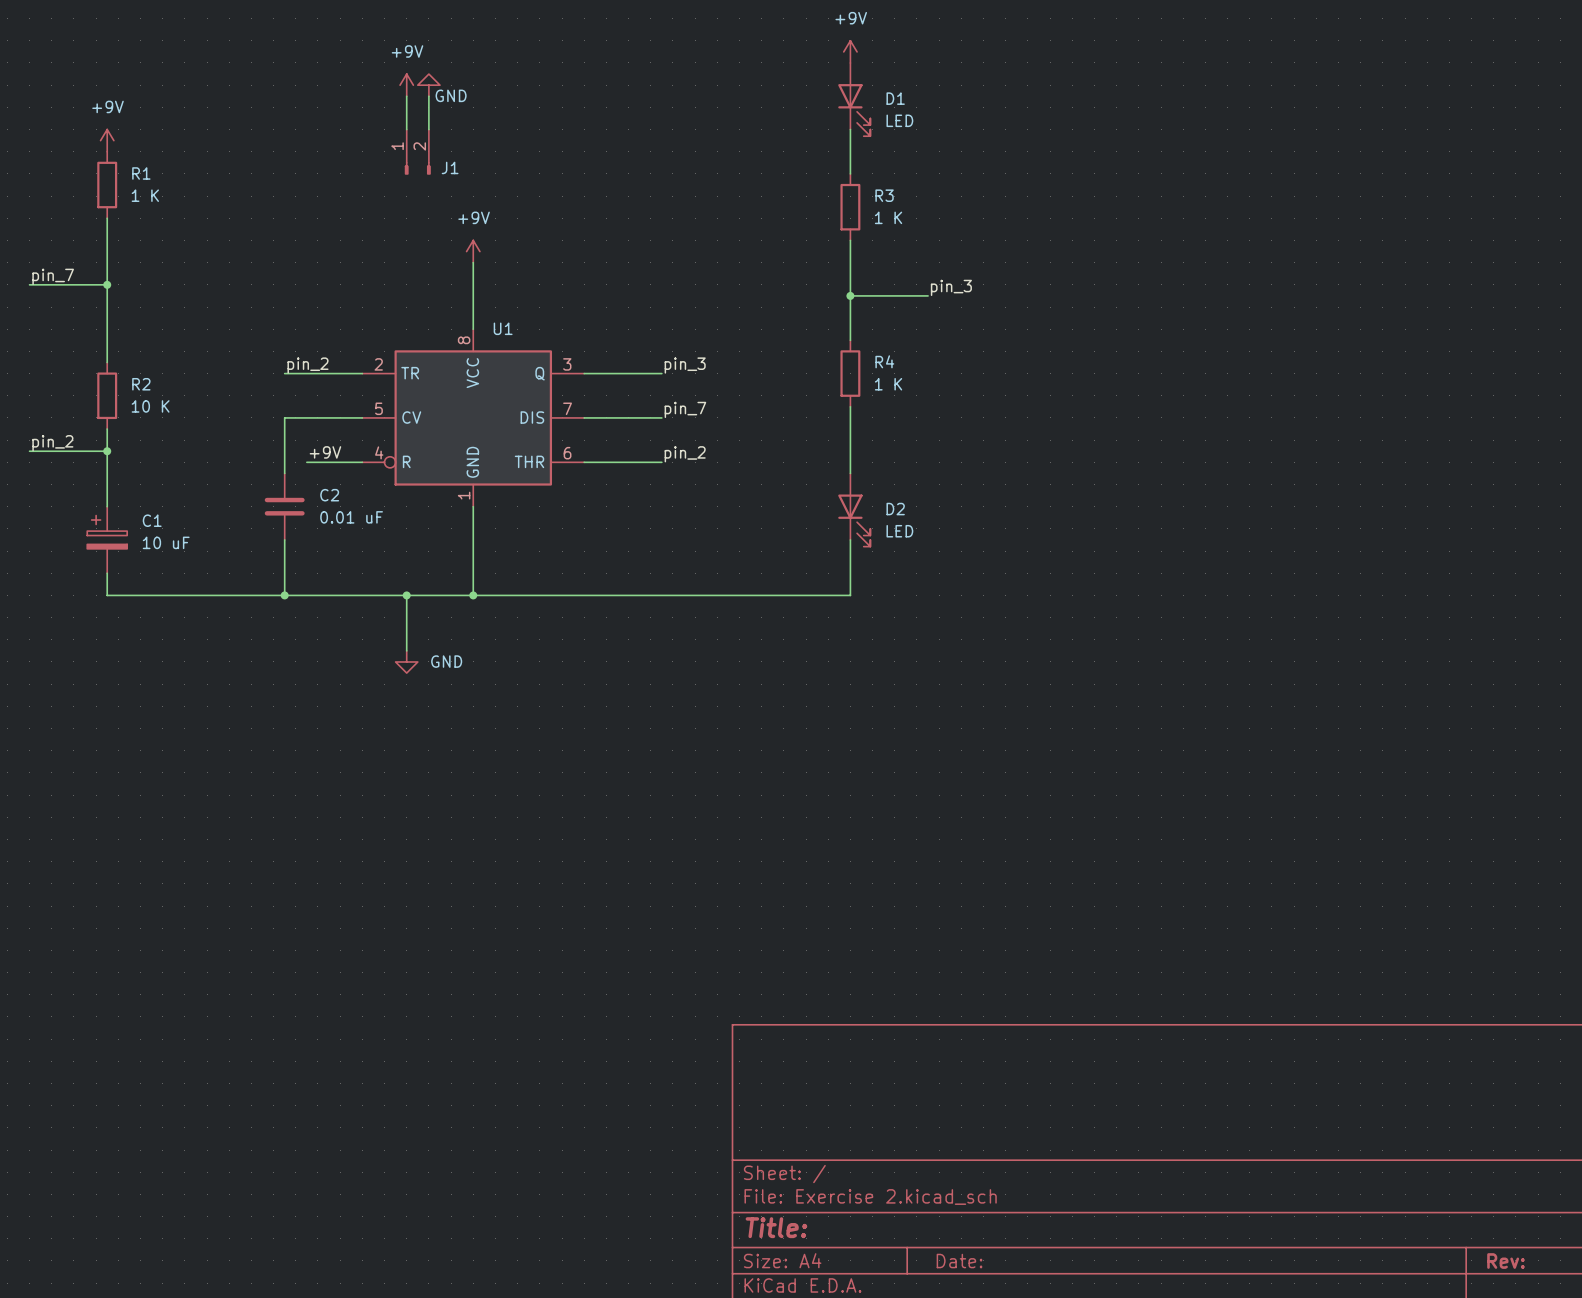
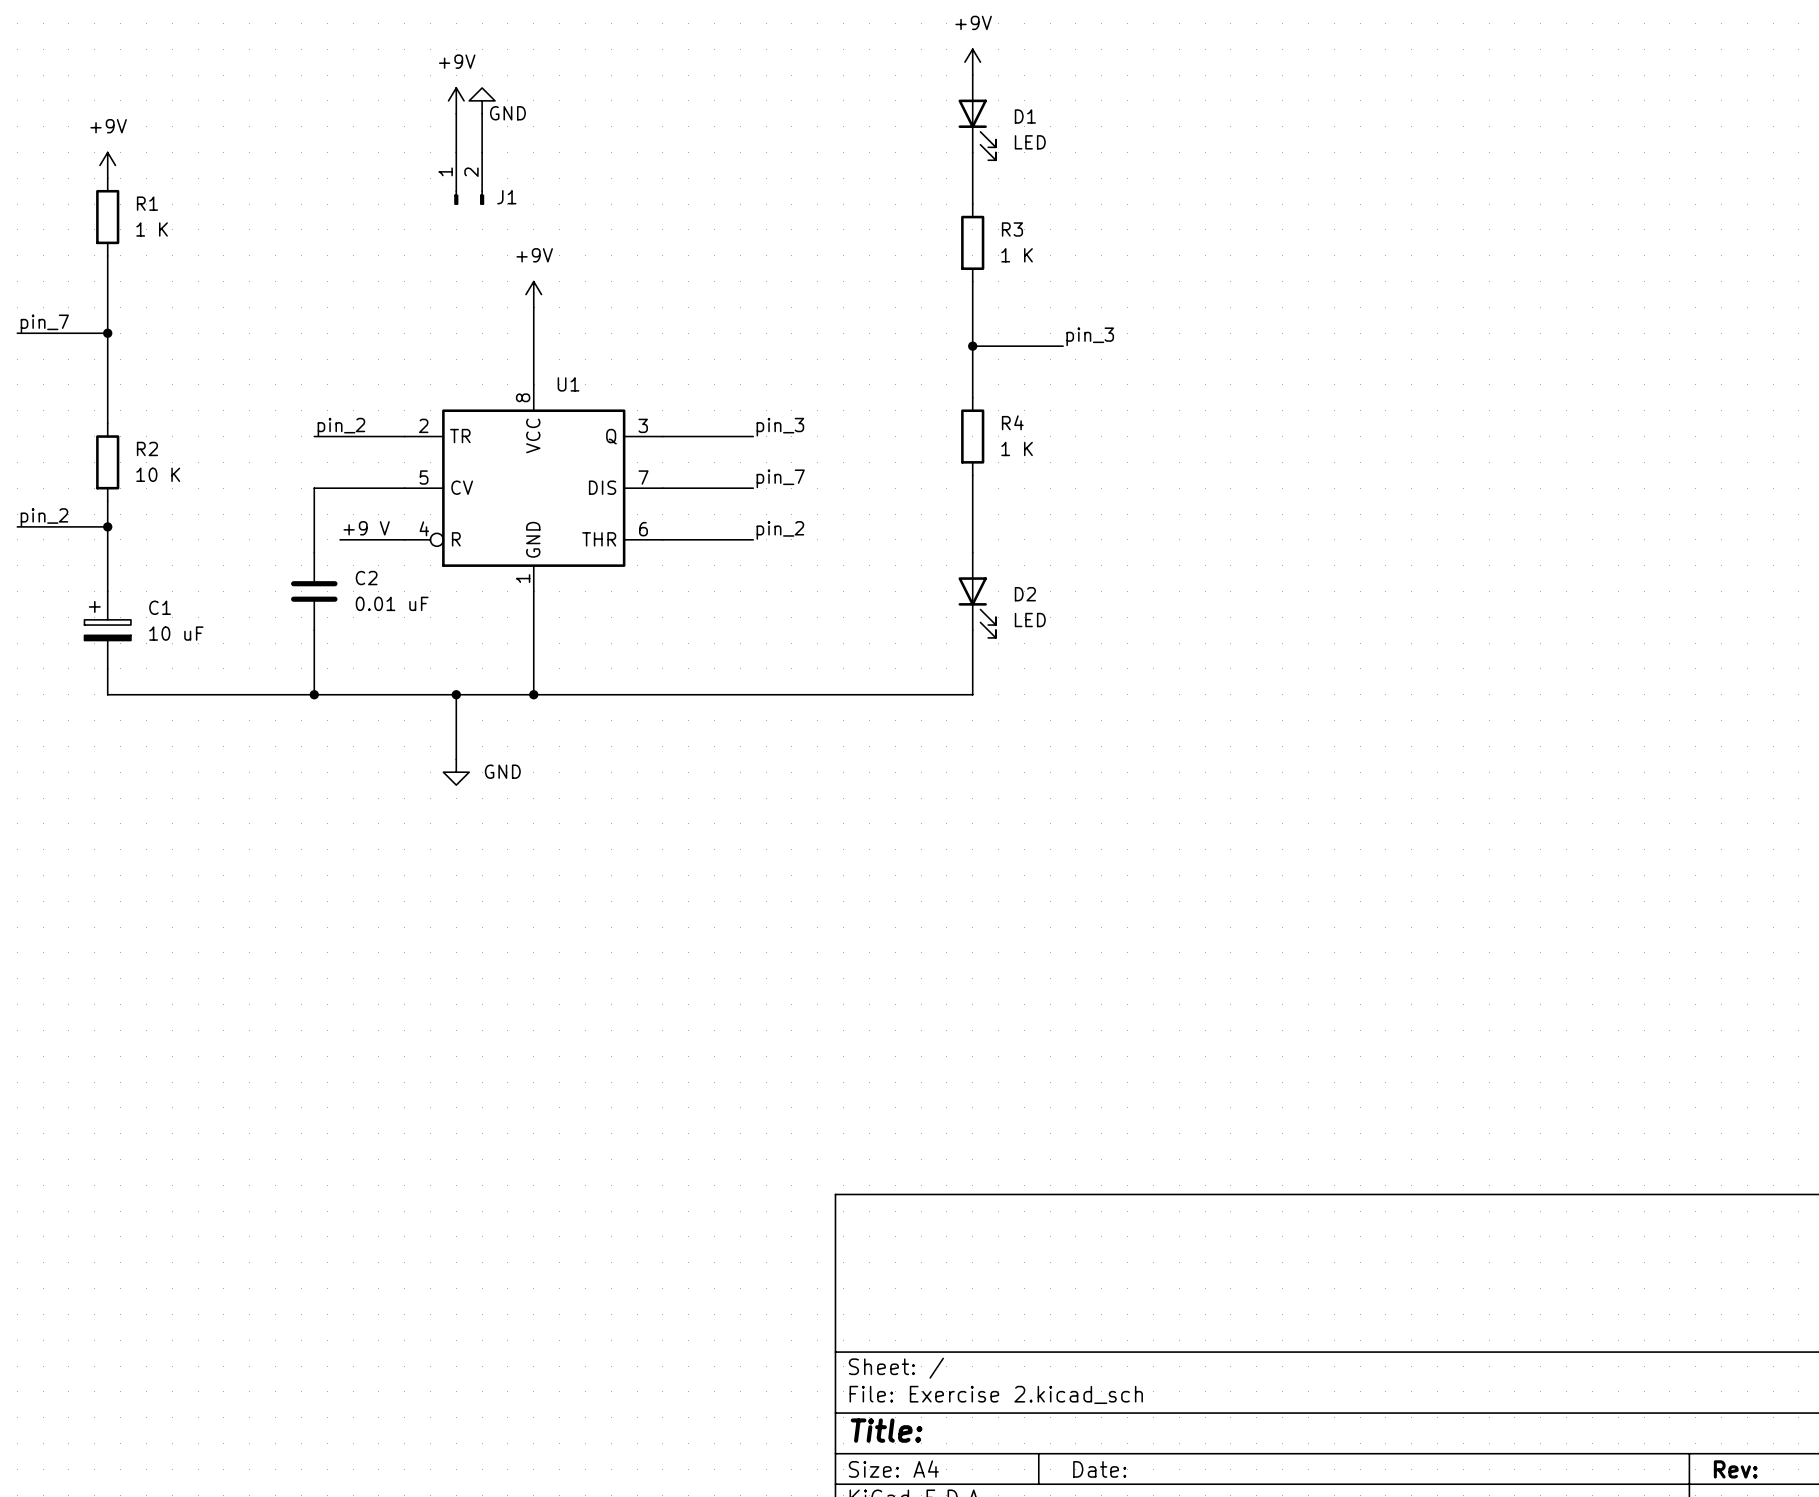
label: +9V (325, 452) -> +9 V (366, 528)

